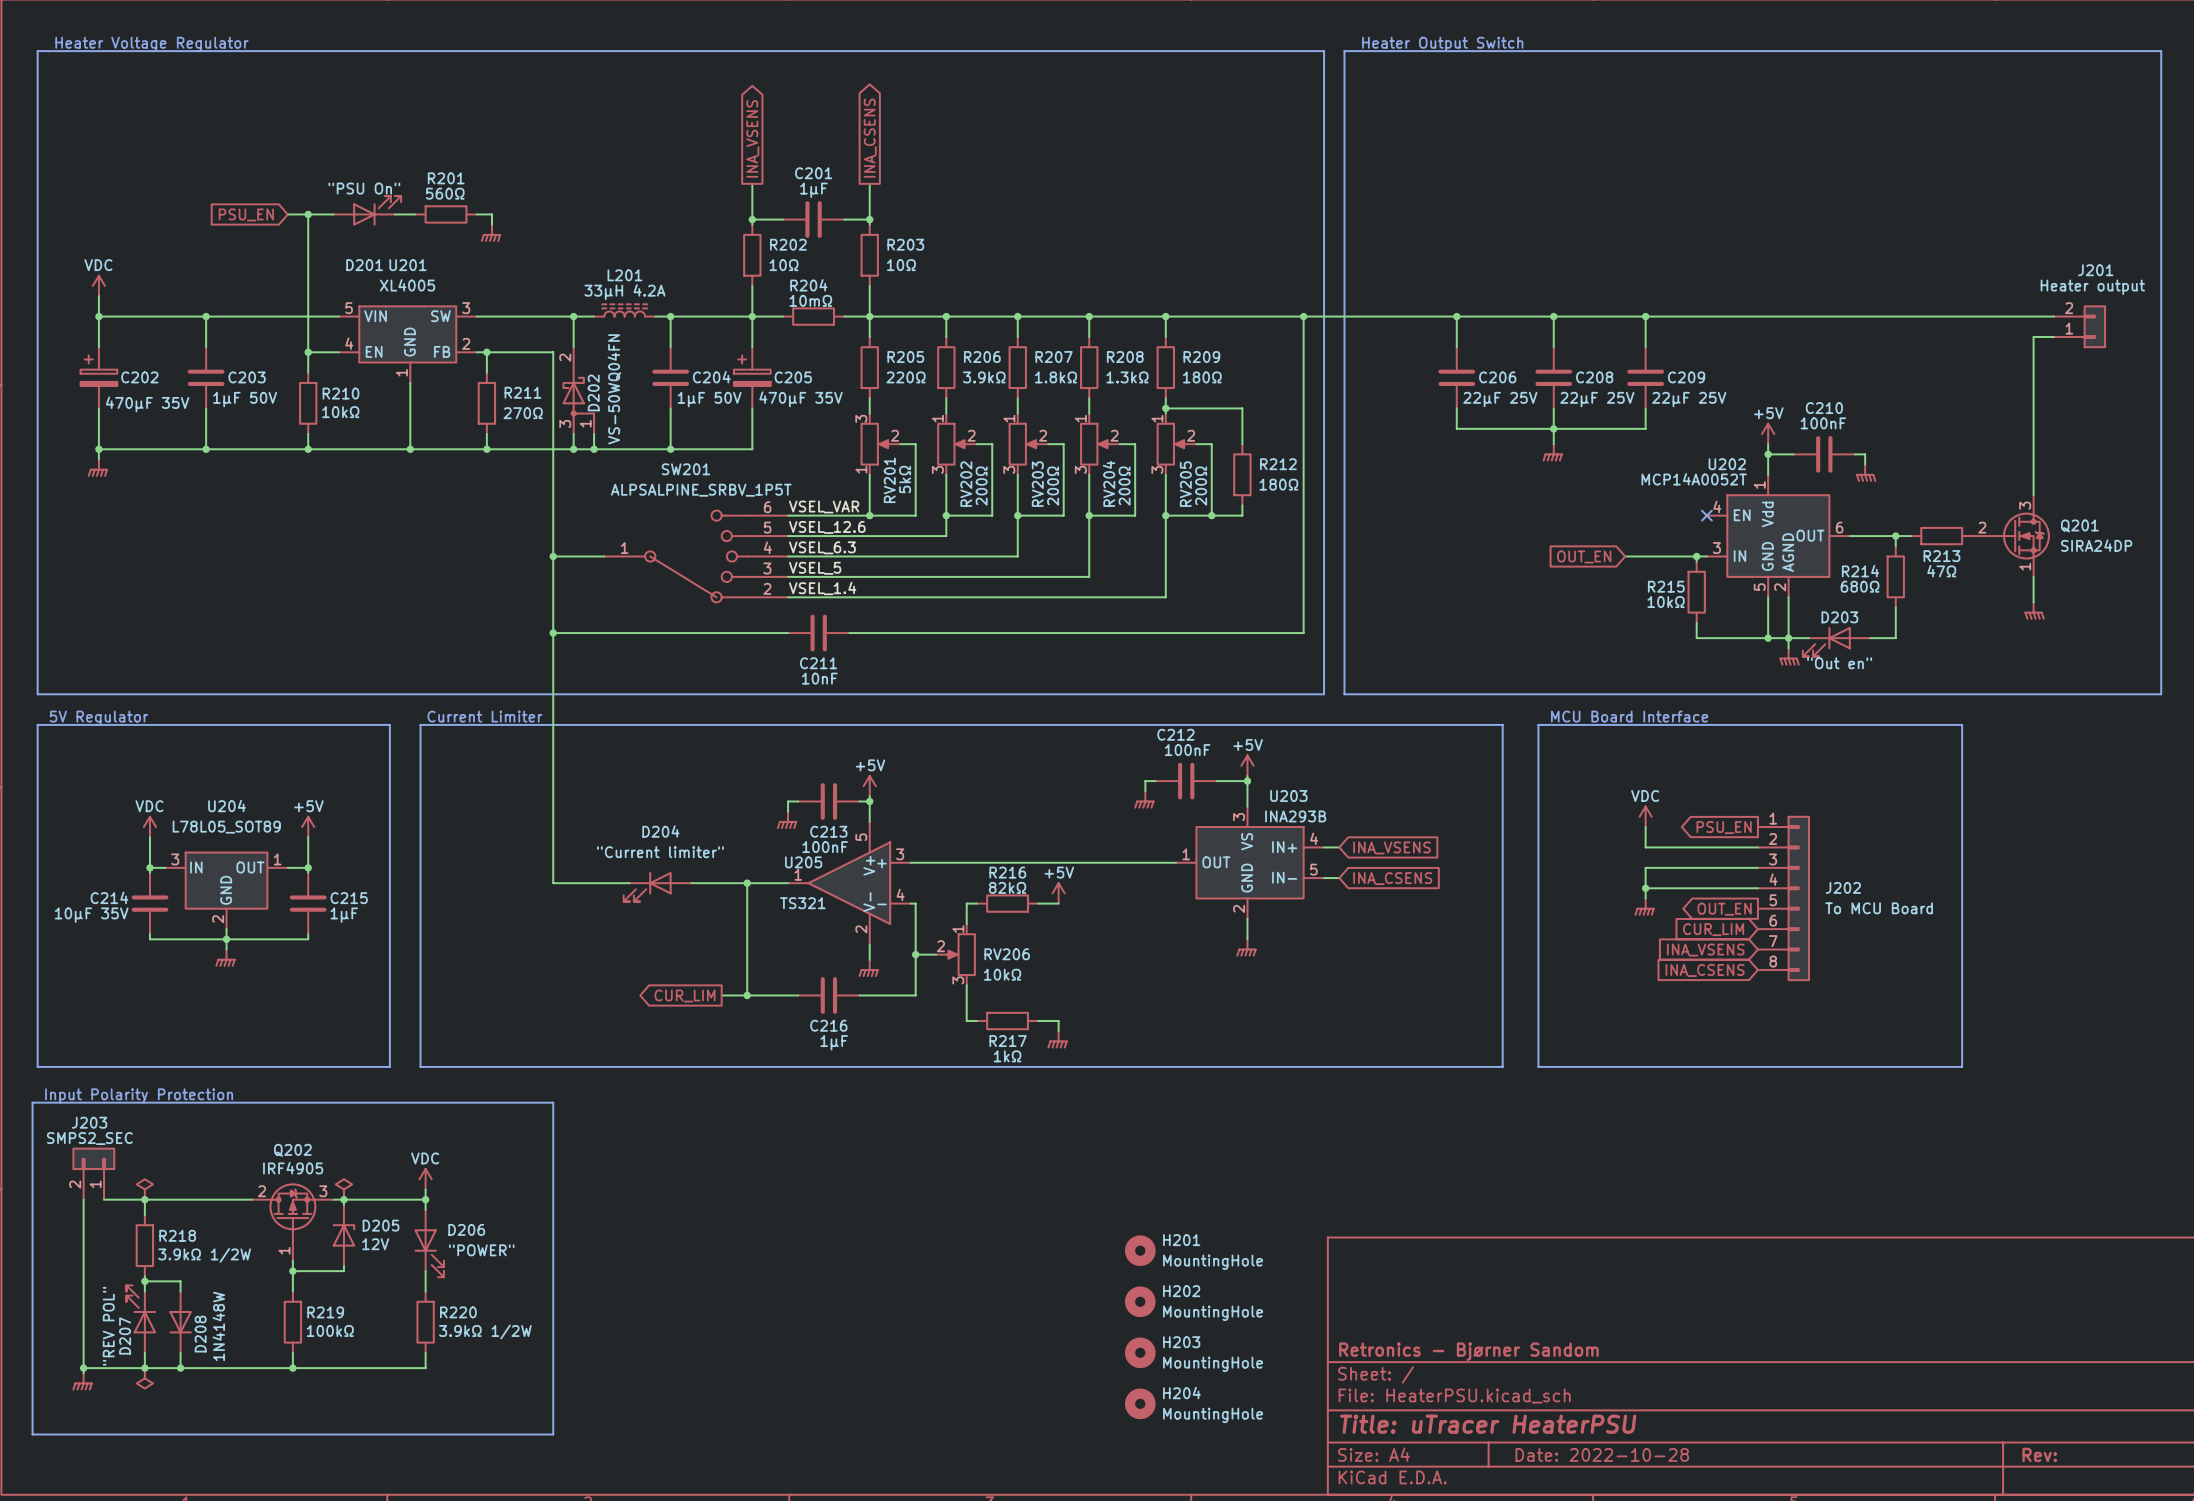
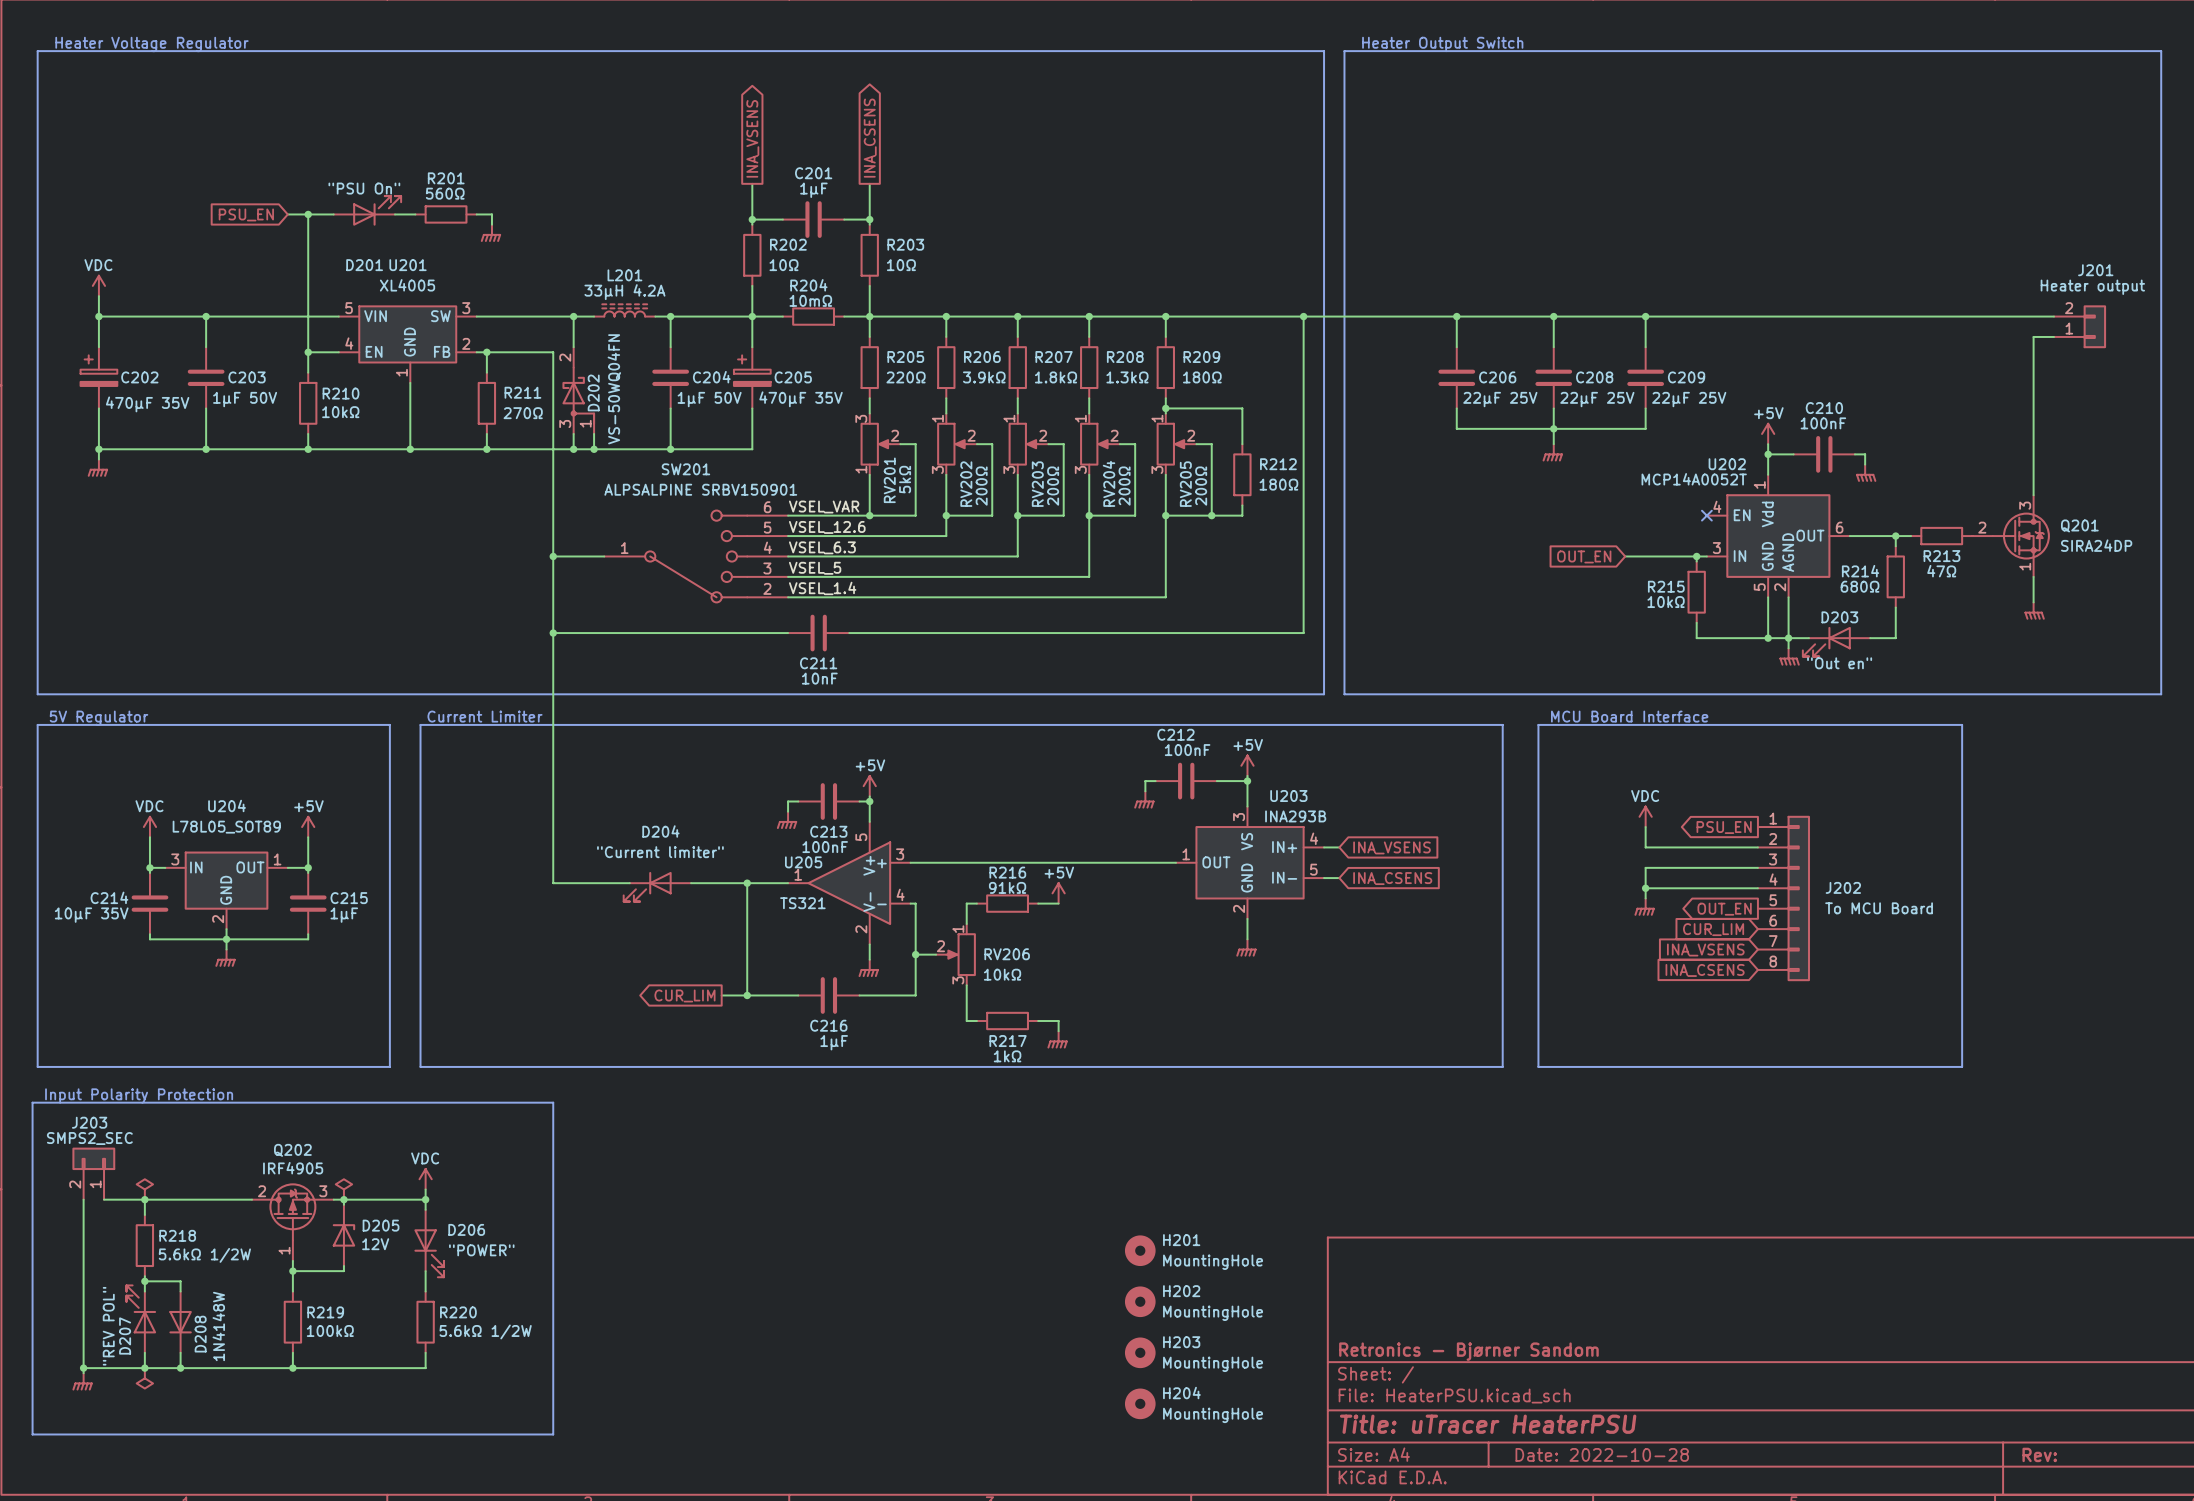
SW201 value: ALPSALPINE_SRBV_1P5T (701, 490) -> ALPSALPINE SRBV150901 (700, 489)
R216 value: 82kΩ (1007, 887) -> 91kΩ (1007, 887)
R218 value: 3.9kΩ 1/2W (204, 1255) -> 5.6kΩ 1/2W (204, 1255)
R220 value: 3.9kΩ 1/2W (485, 1331) -> 5.6kΩ 1/2W (485, 1331)

